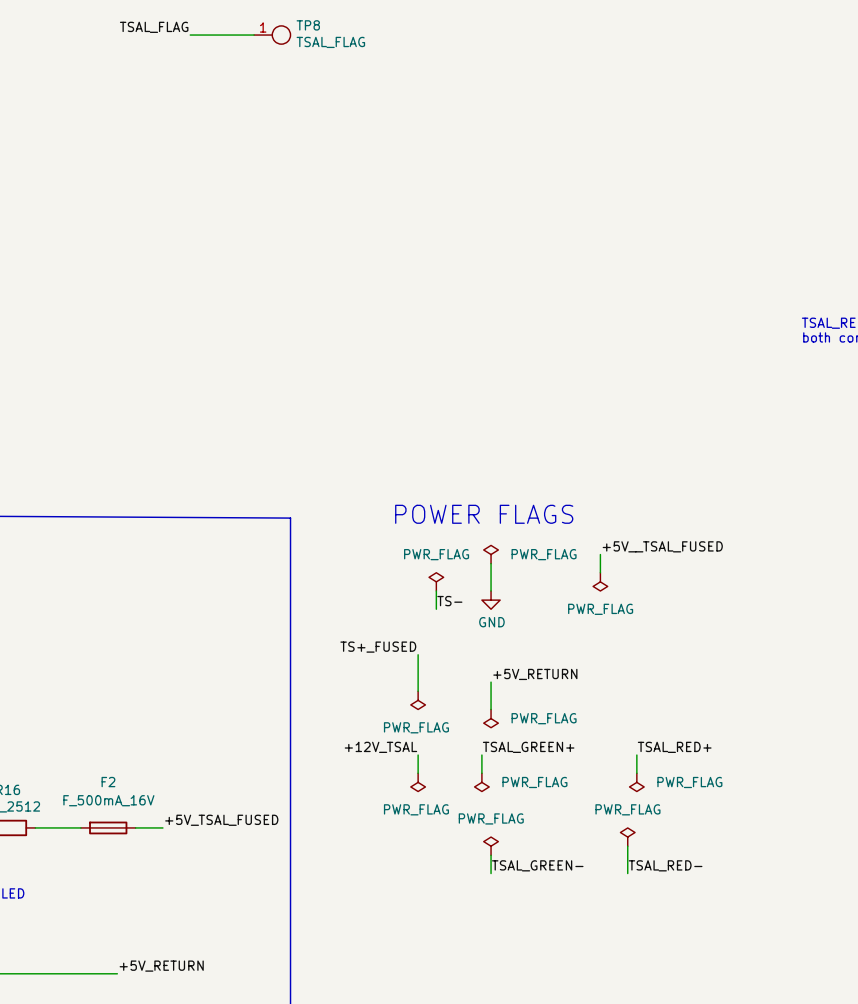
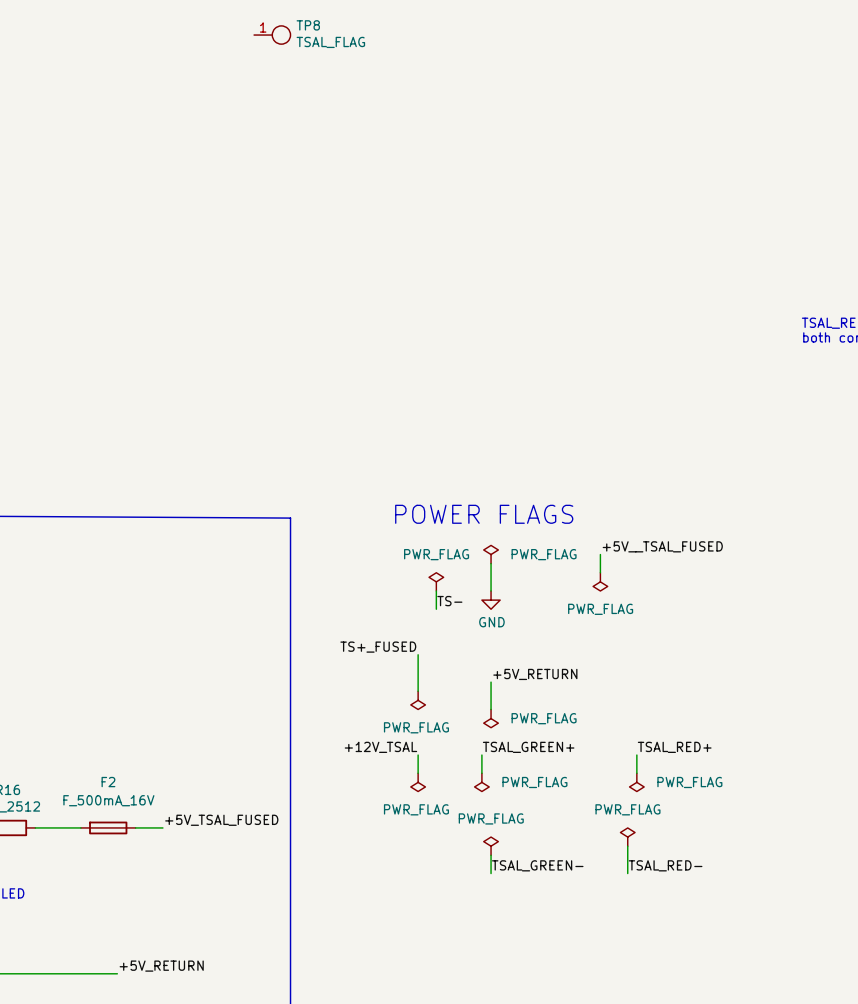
label: TSAL_FLAG (154, 27) -> none
wire: (190, 35) (254, 35) -> none

